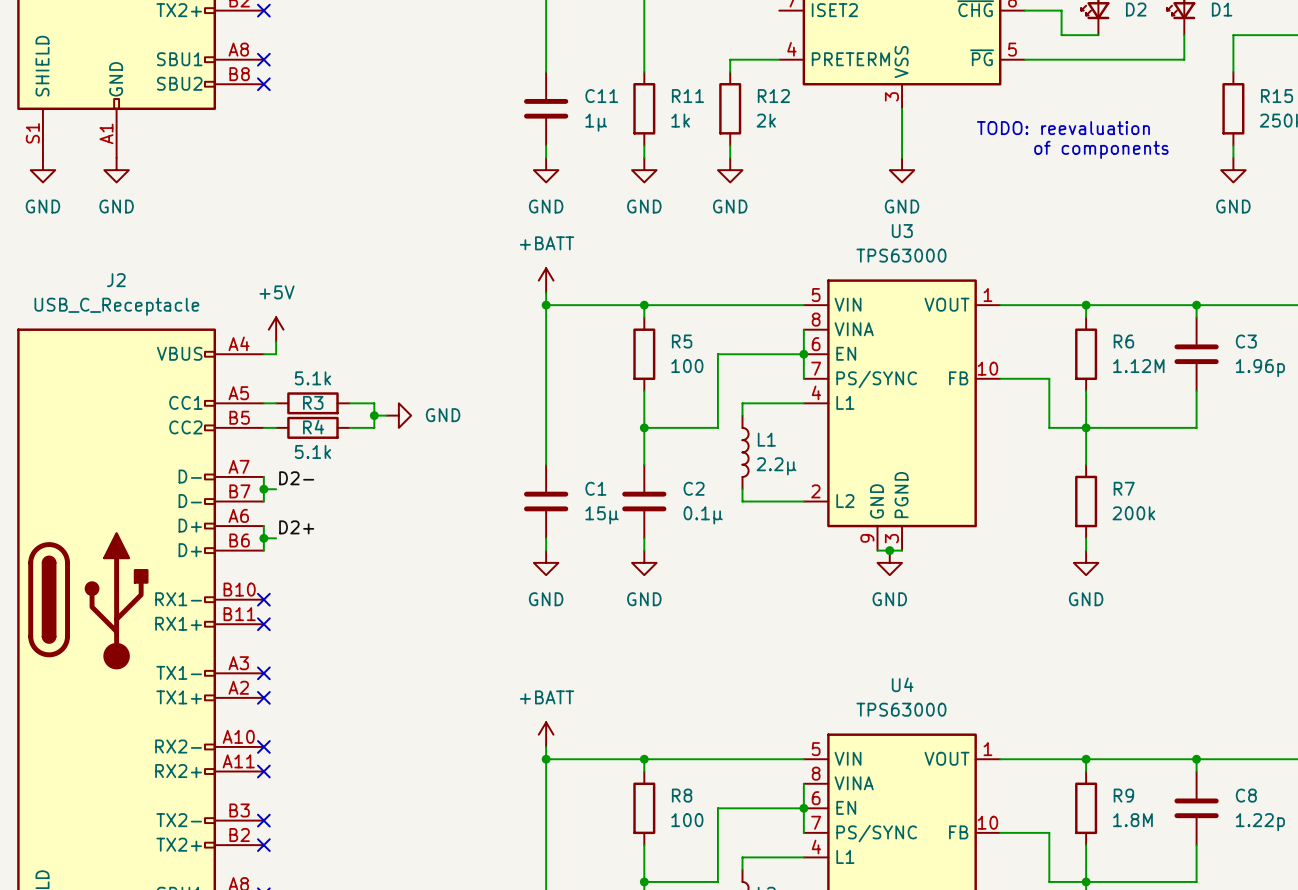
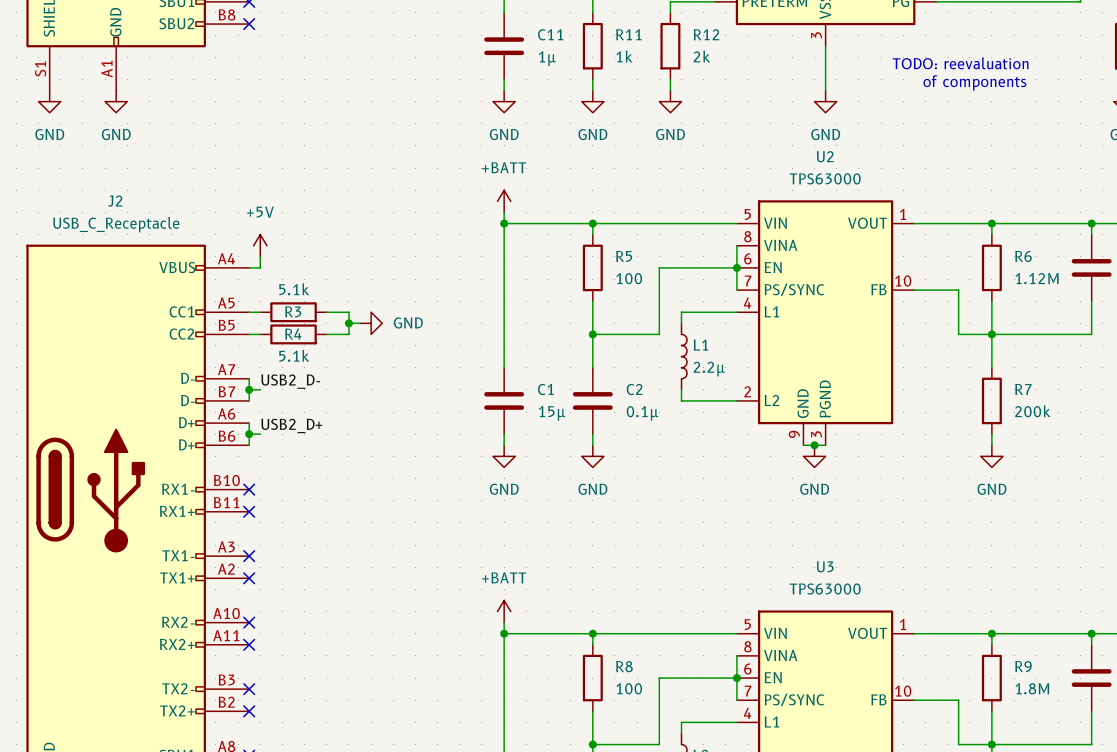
U3 name: U3 (902, 231) -> U2 (825, 156)
label: D2- (296, 478) -> USB2_D- (290, 381)
label: D2+ (296, 527) -> USB2_D+ (291, 425)
U4 name: U4 (902, 684) -> U3 (825, 566)

